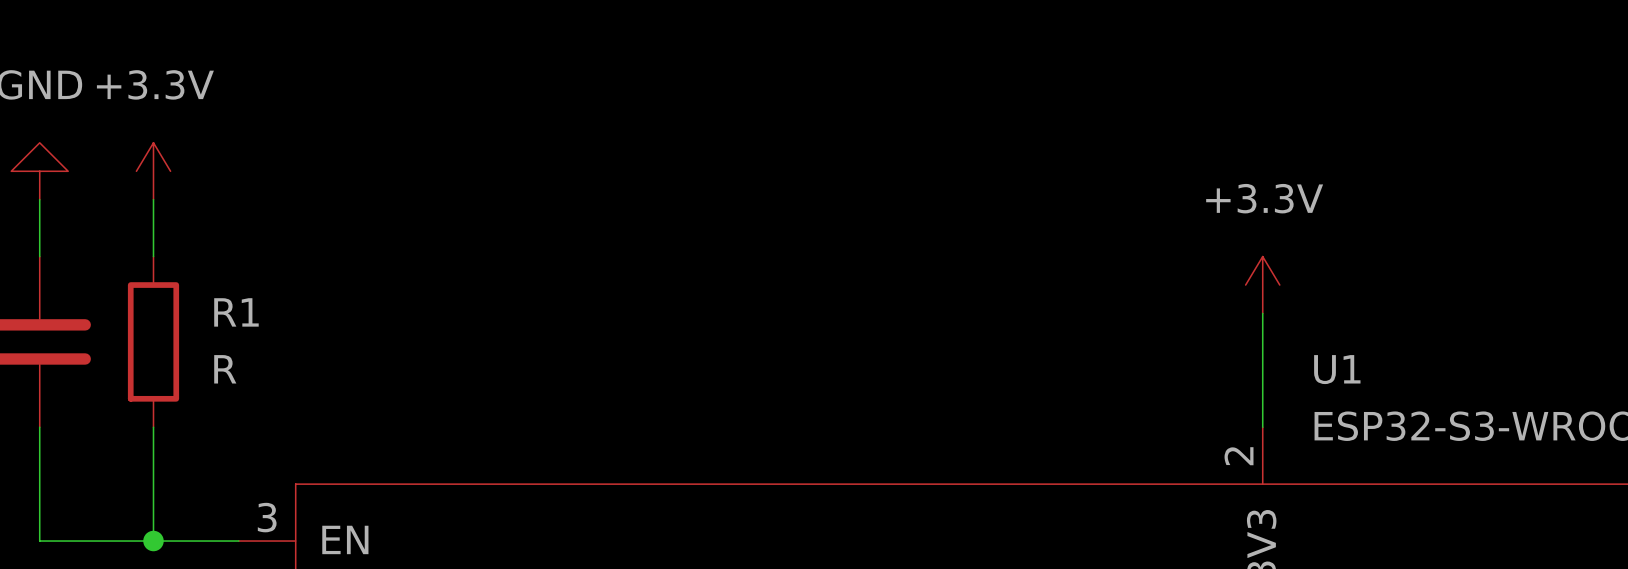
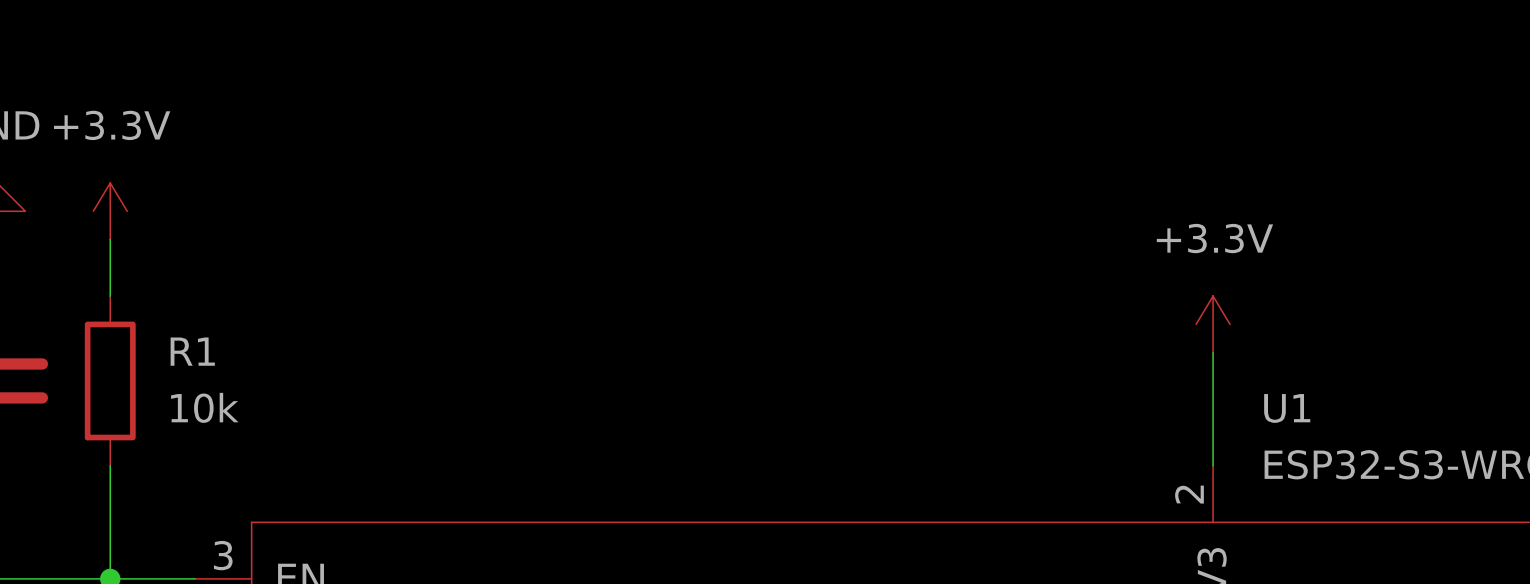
R1 value: R (225, 369) -> 10k (204, 407)

